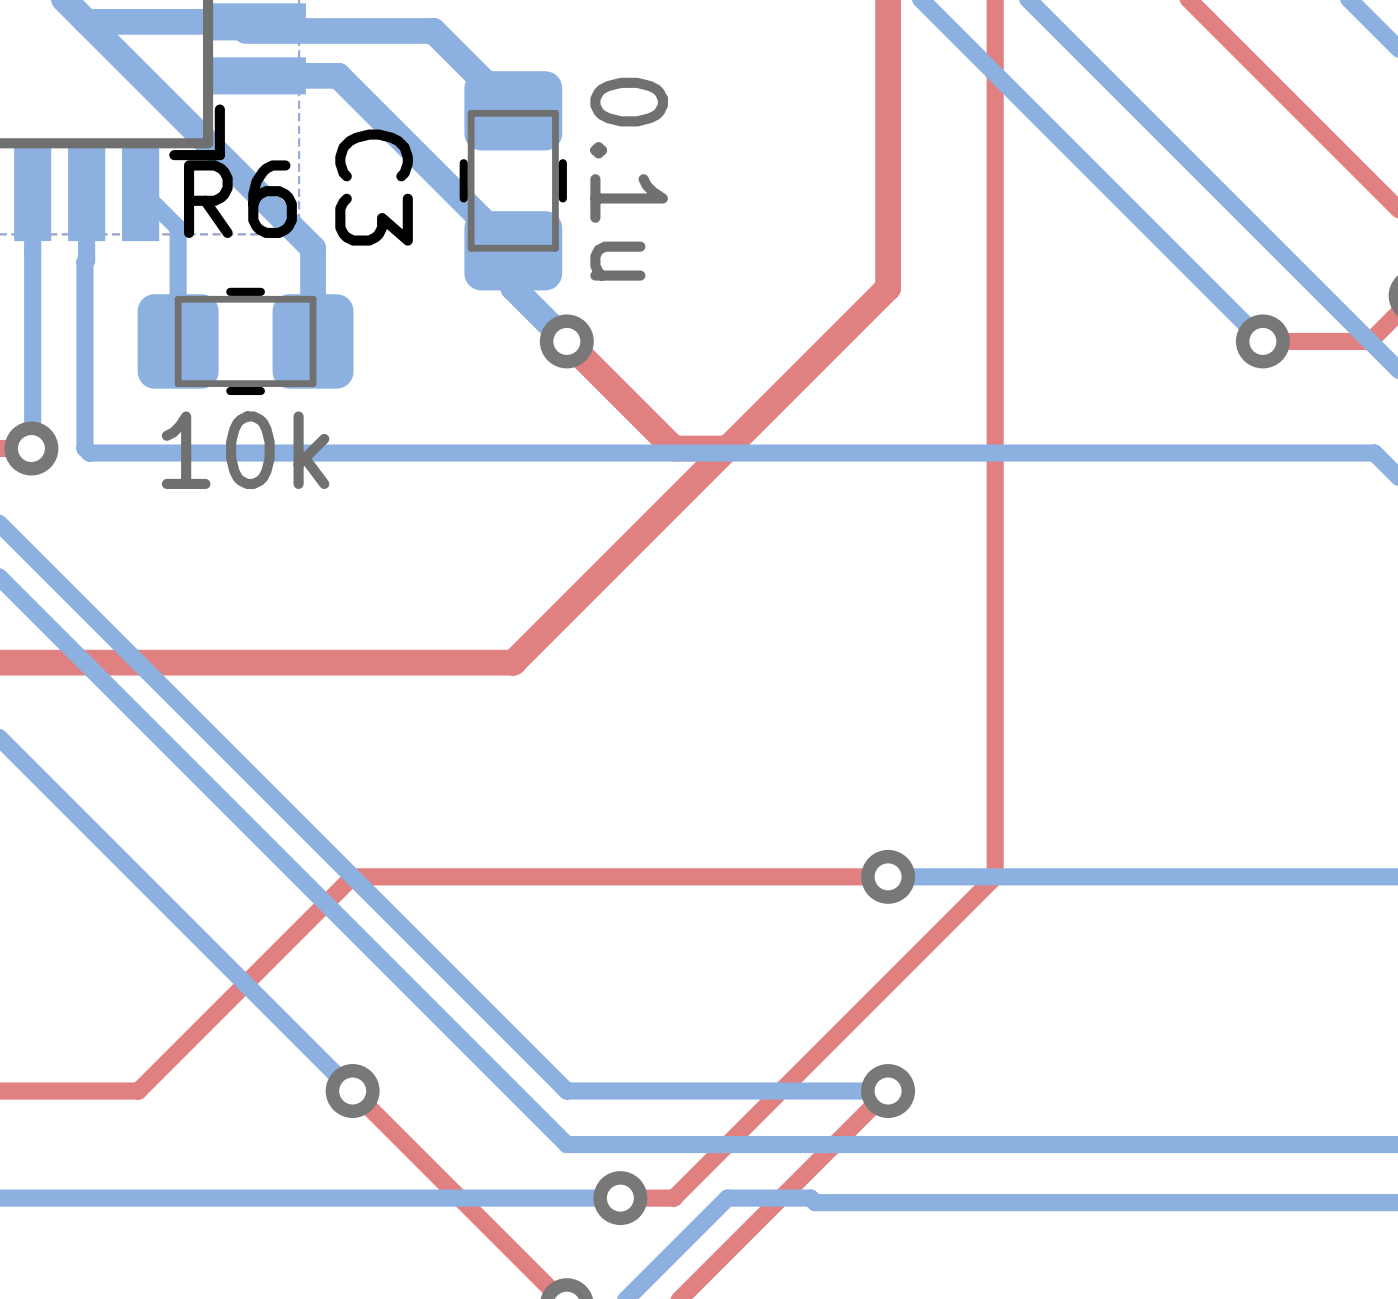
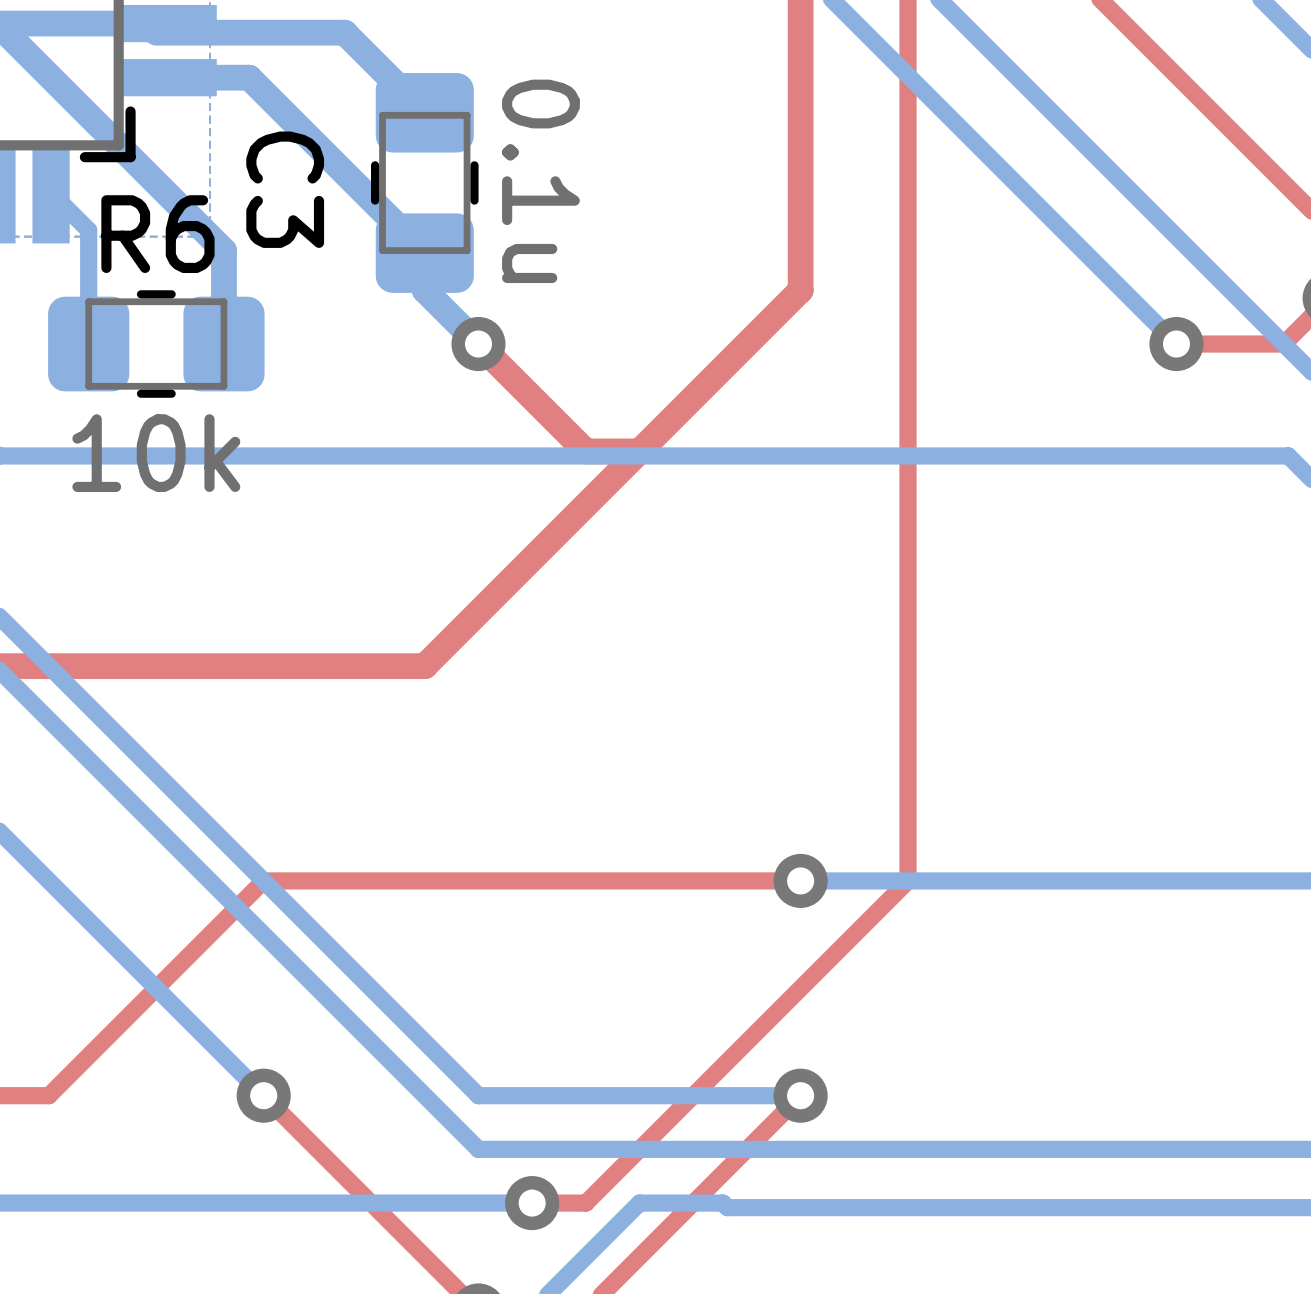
R6 name position: R6 (240, 199) -> R6 (157, 234)

